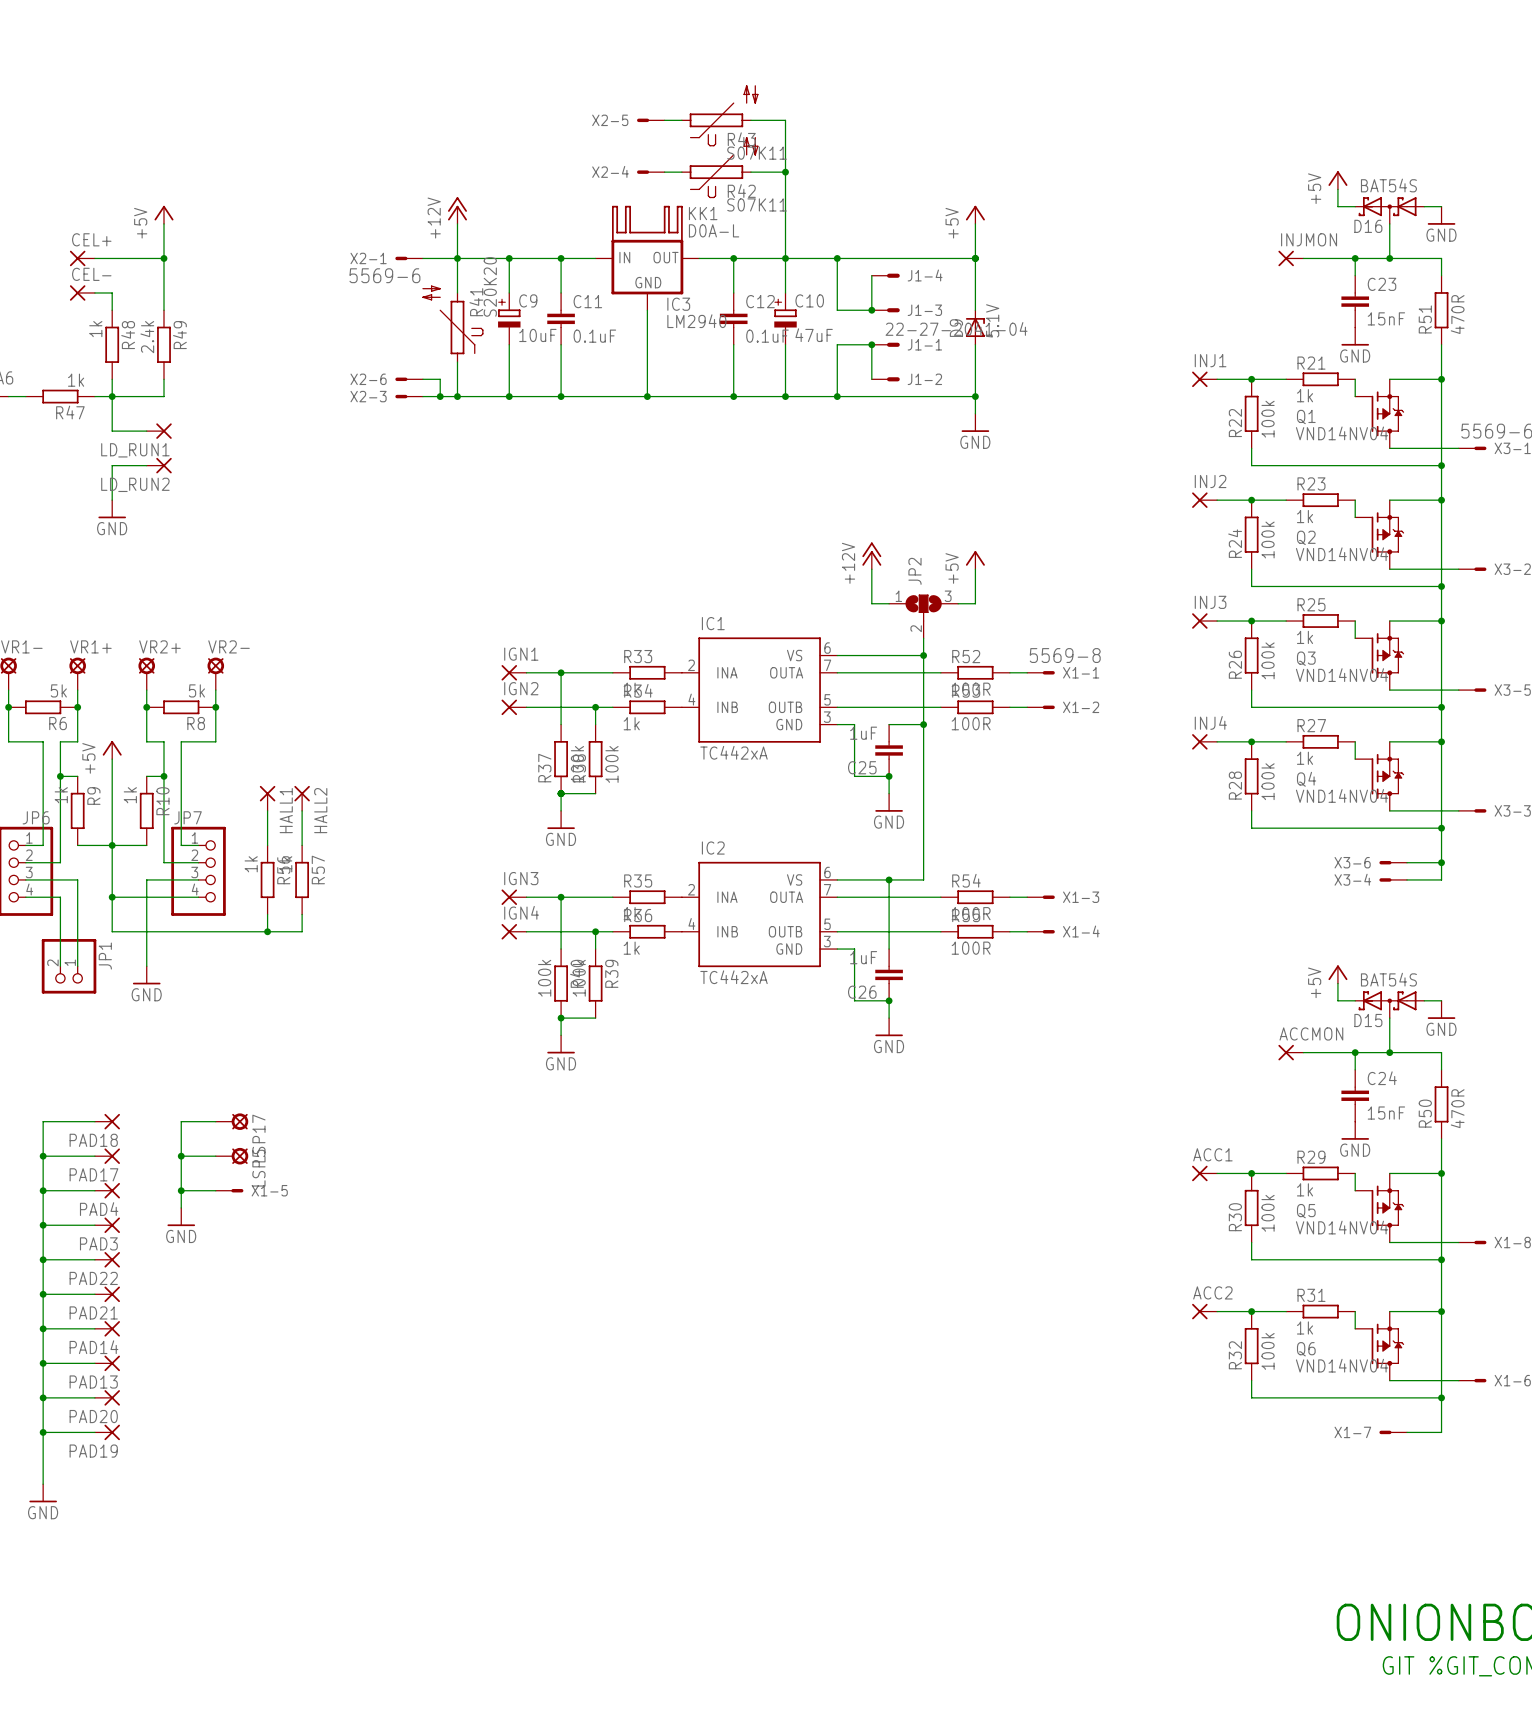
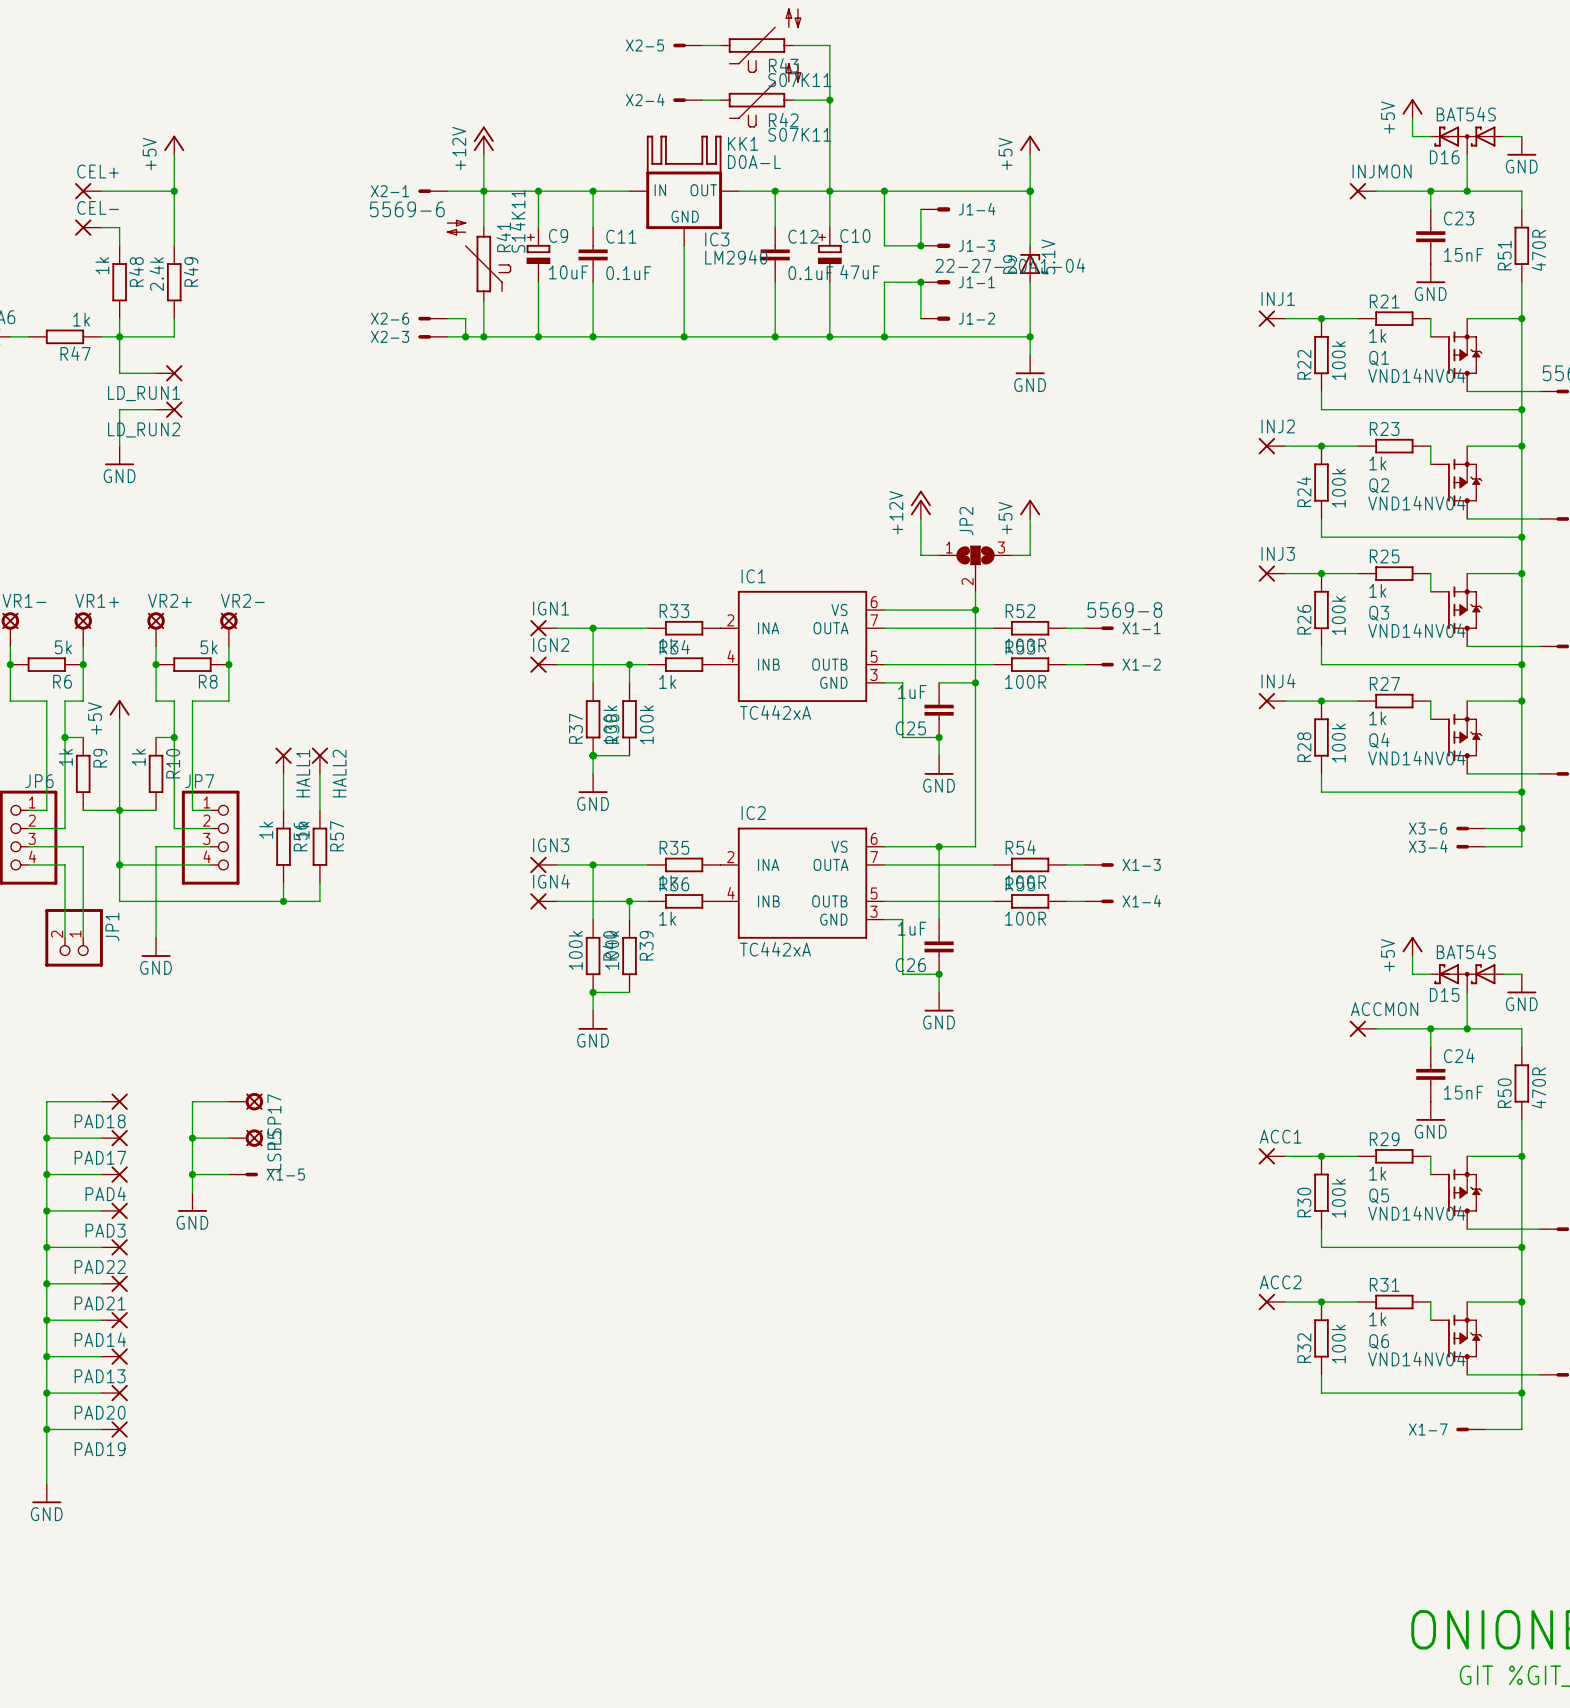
R41 value: S20K20 (490, 286) -> S14K11 (518, 221)

